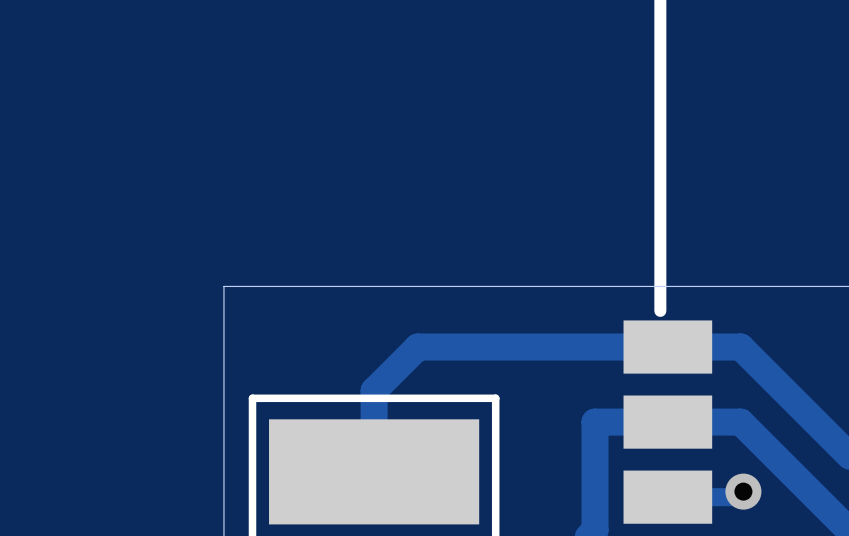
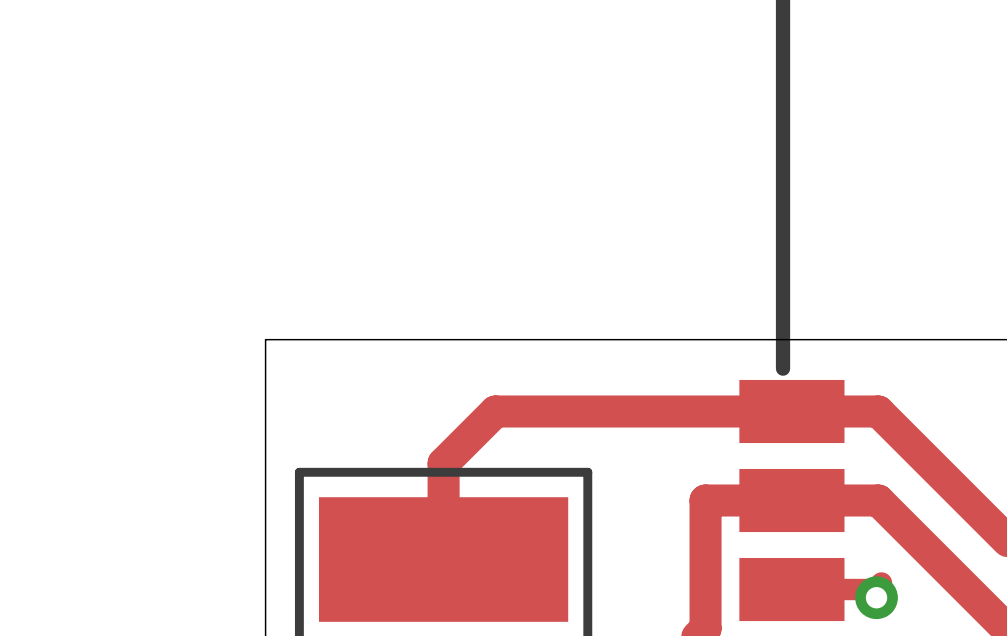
via position: (743, 491) -> (876, 597)

